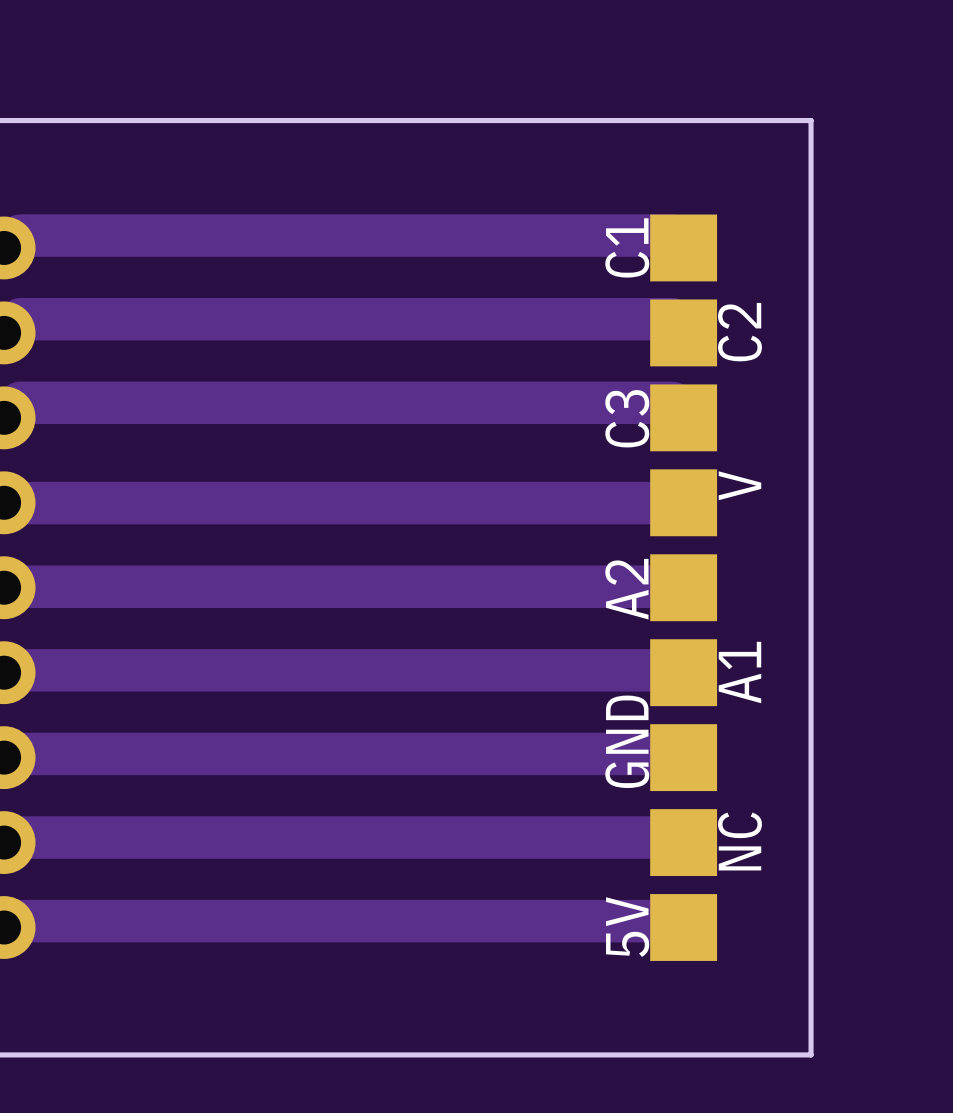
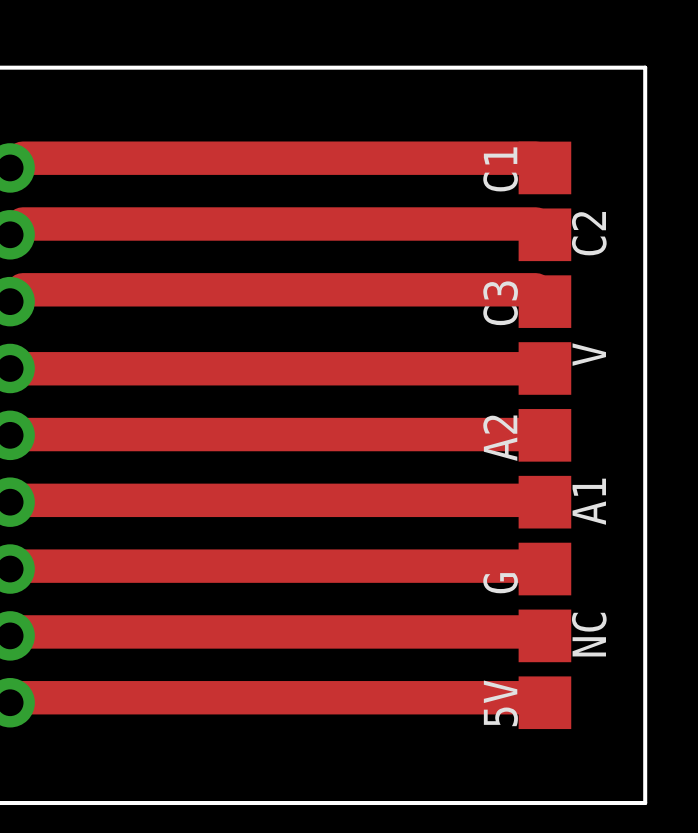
GND name: GND (627, 741) -> G (500, 583)

